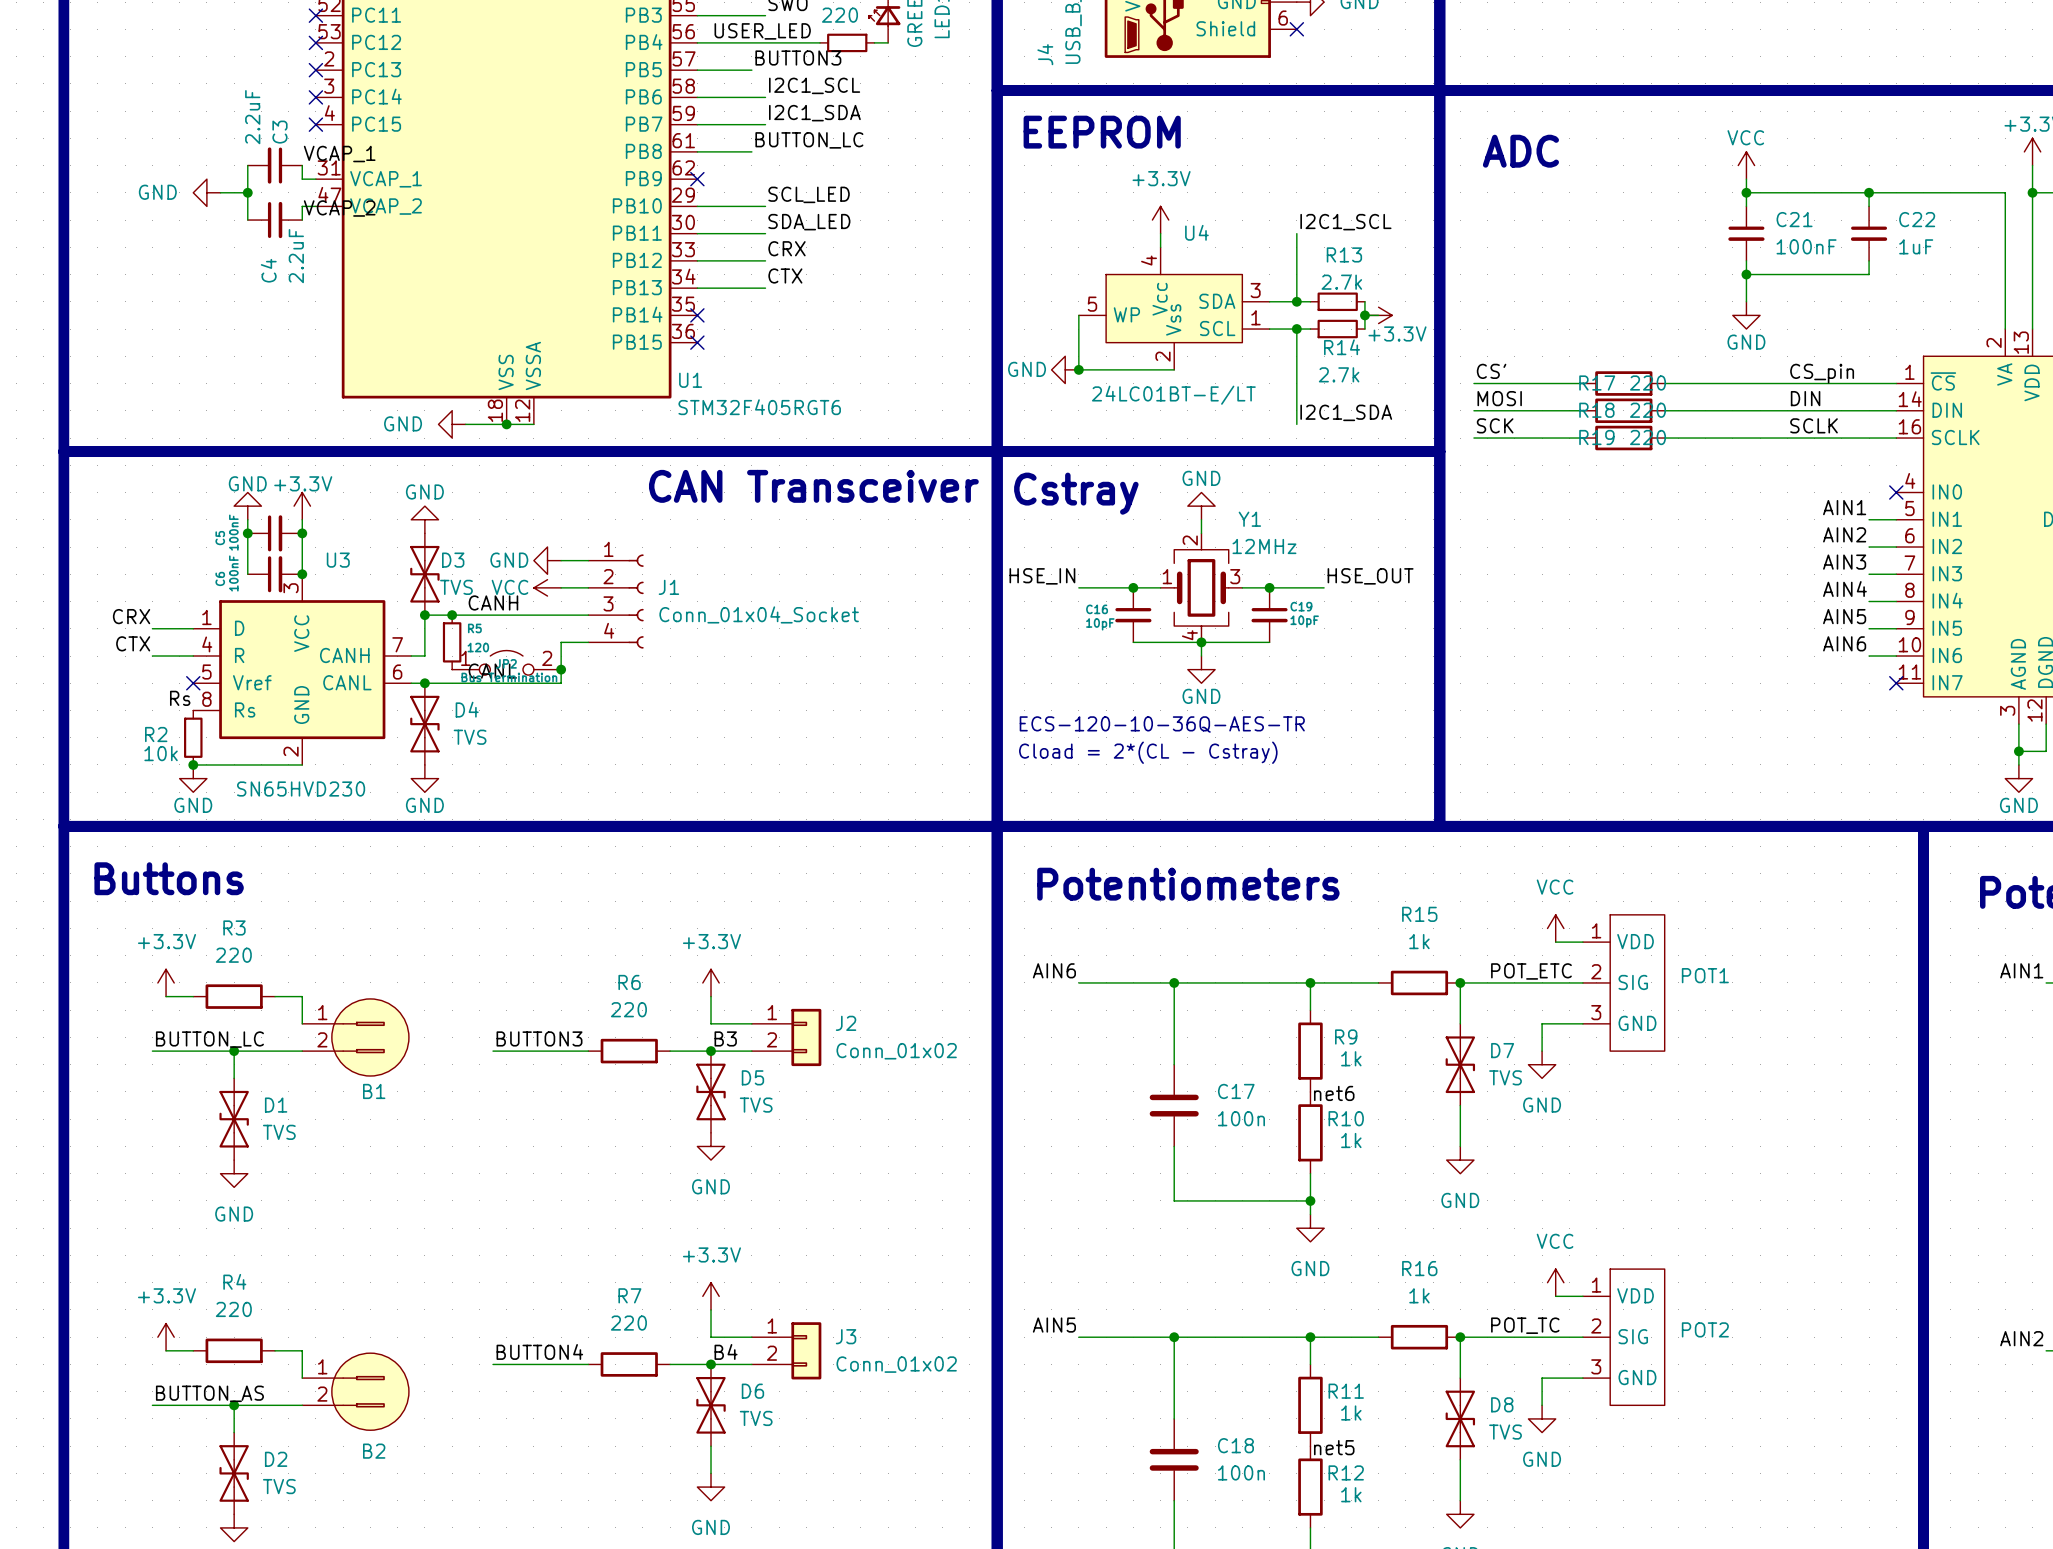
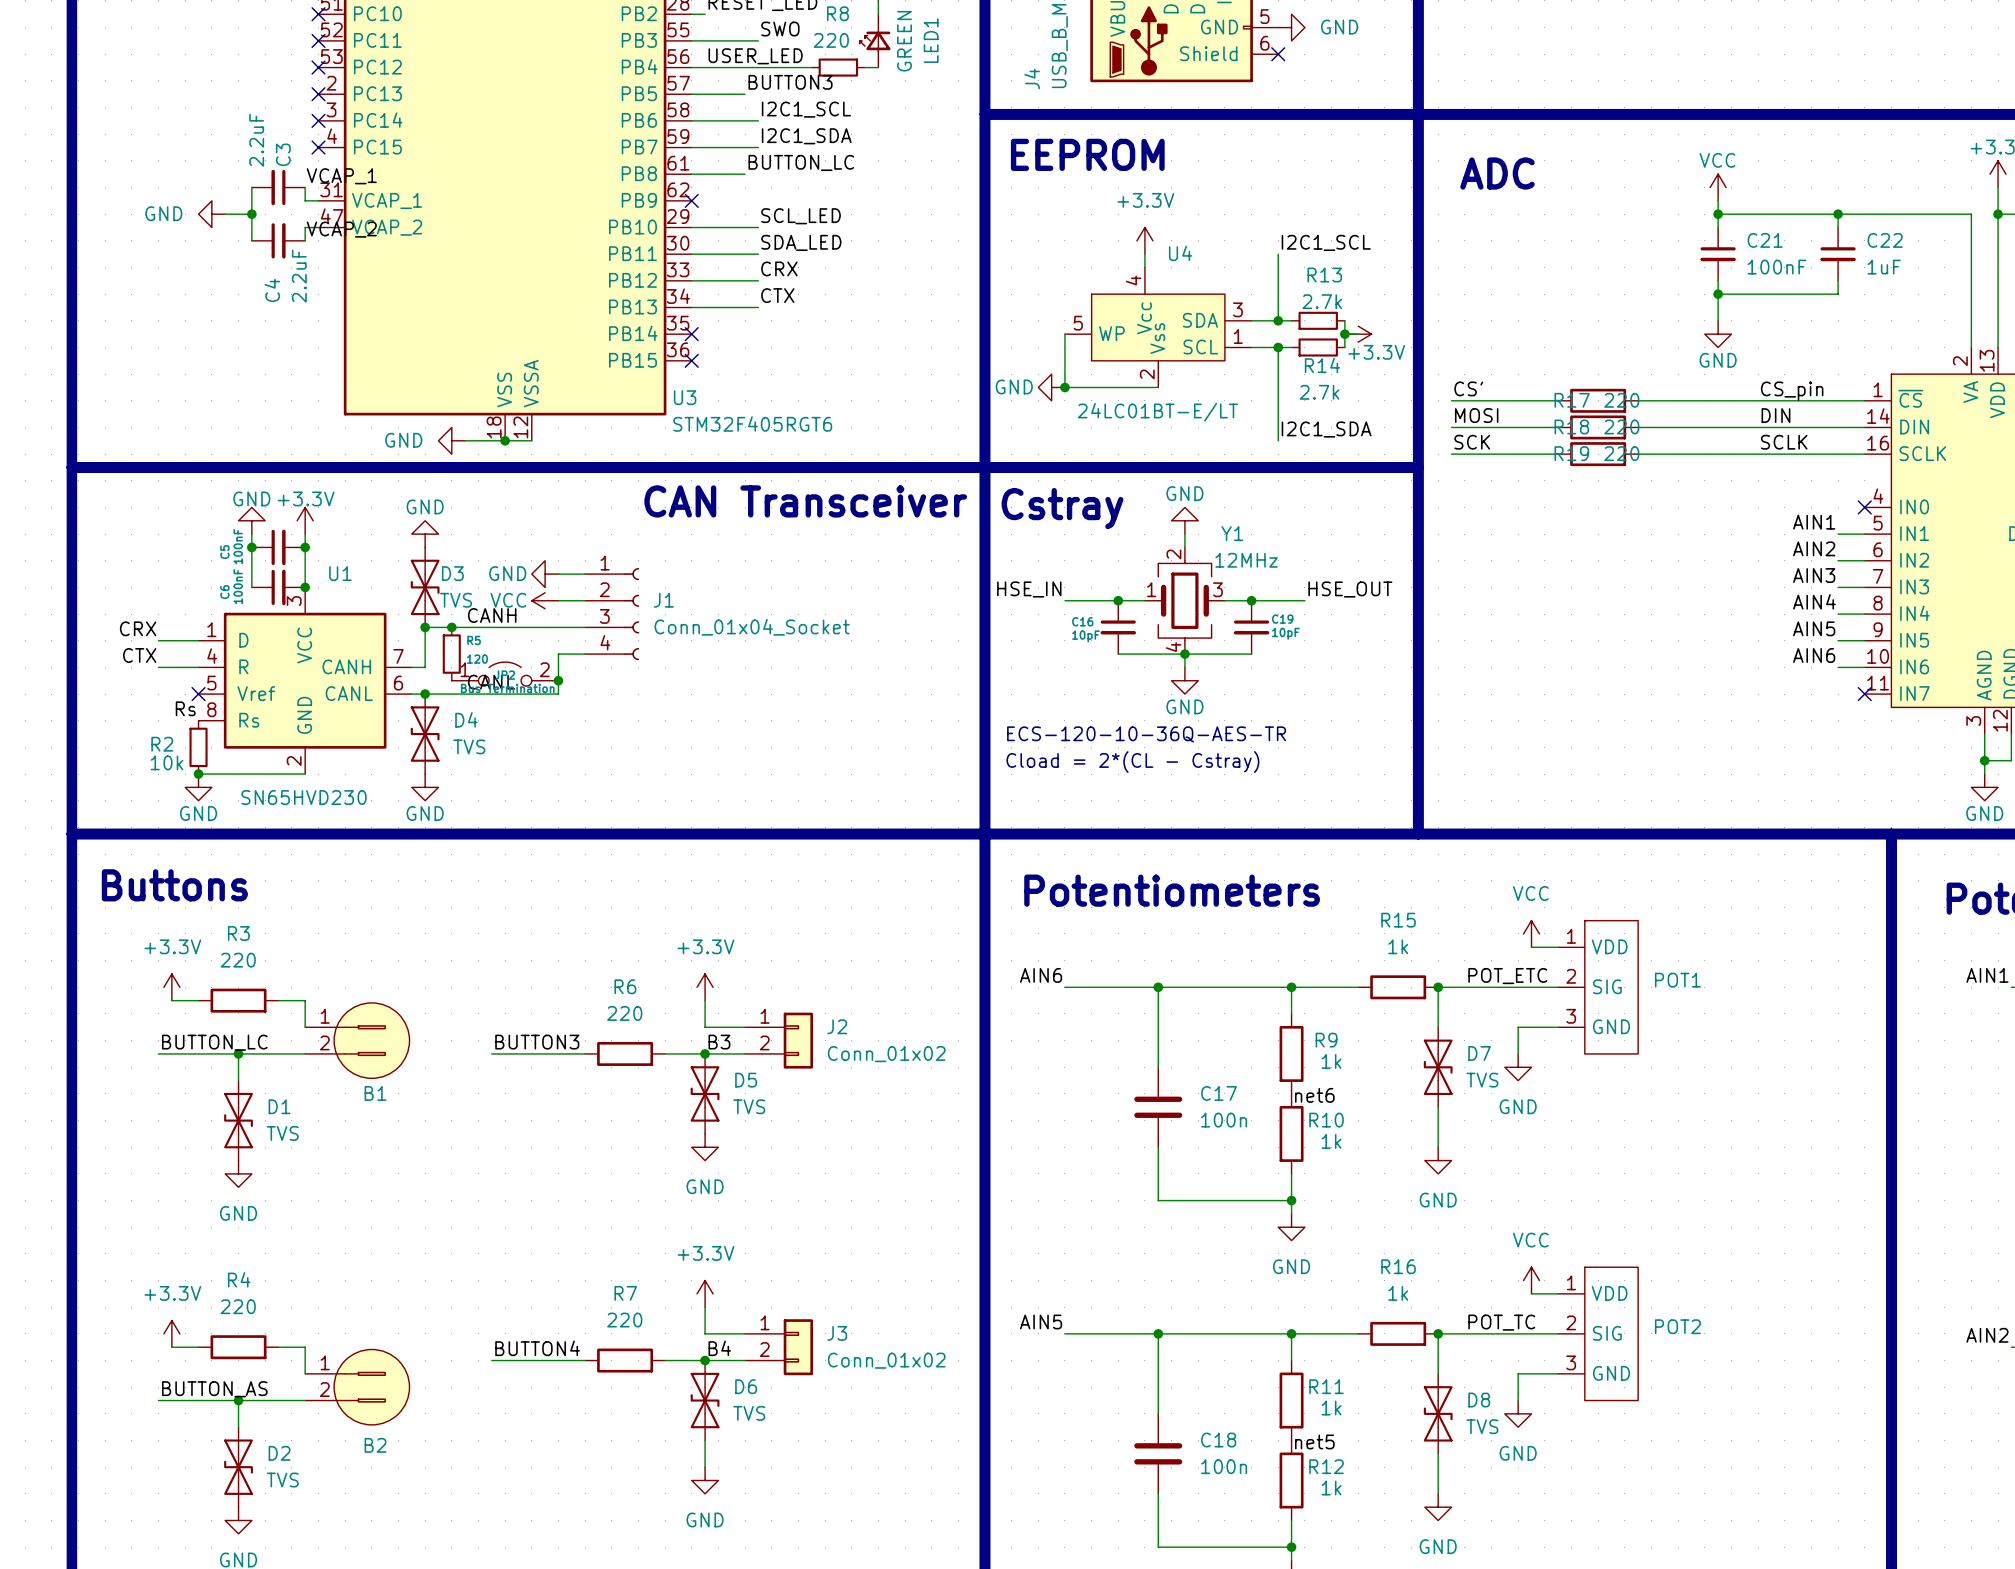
U1 name: U1 (690, 380) -> U3 (685, 397)
U3 name: U3 (338, 560) -> U1 (340, 573)

